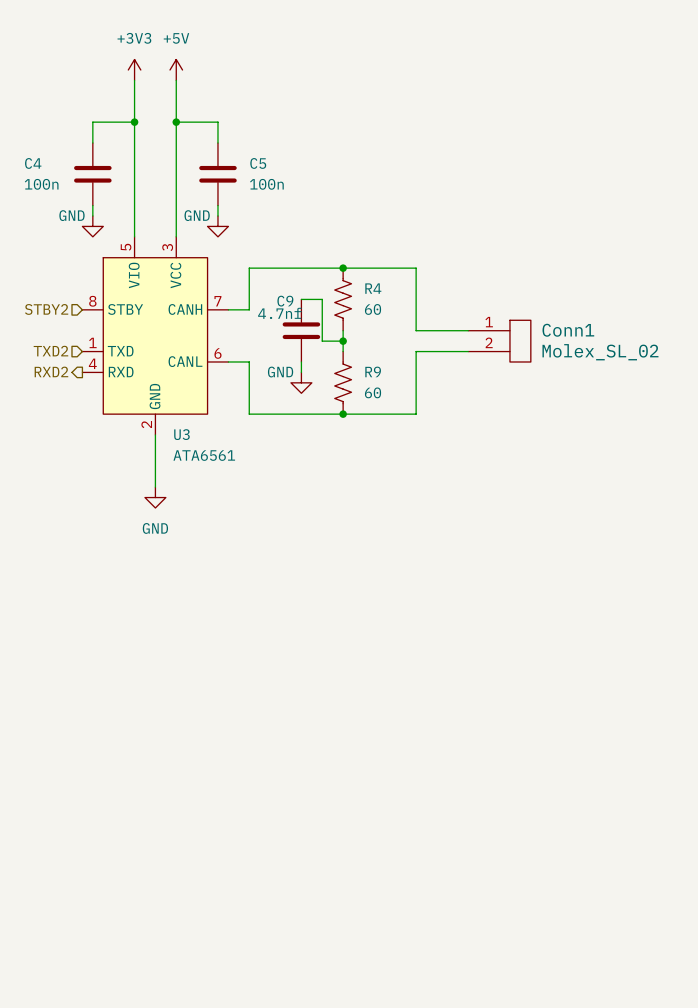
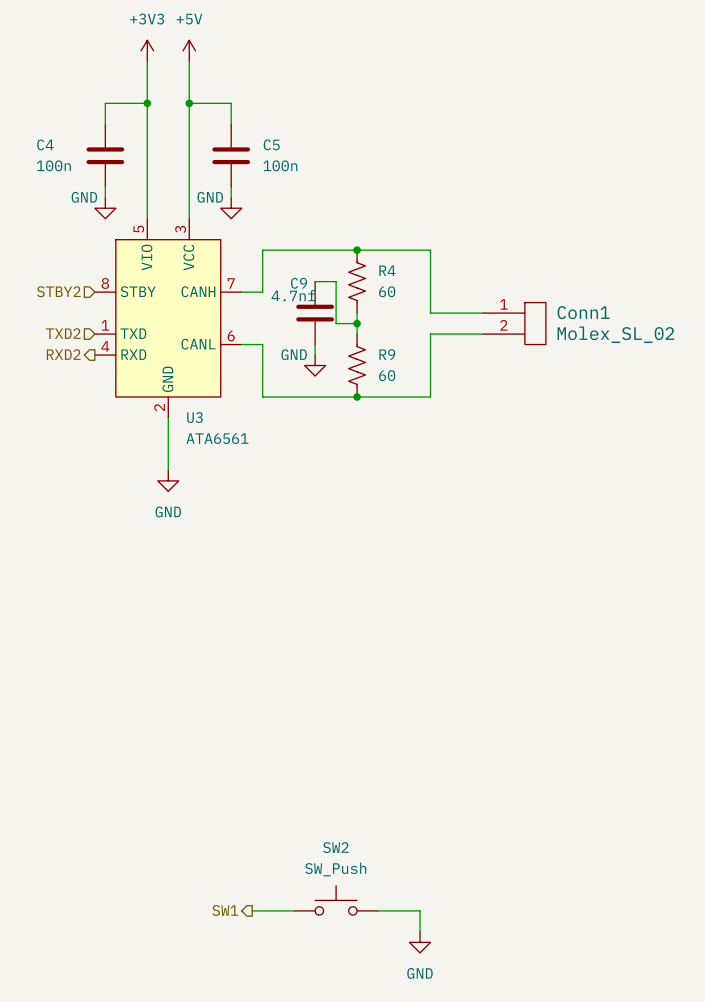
SW2: none -> SW_Push (336, 900)
hierarchical label: none -> SW1 (225, 910)
wire: none -> (252, 910) (294, 910)
wire: none -> (378, 910) (420, 910) (420, 931)
power symbol: none -> GND (420, 942)

